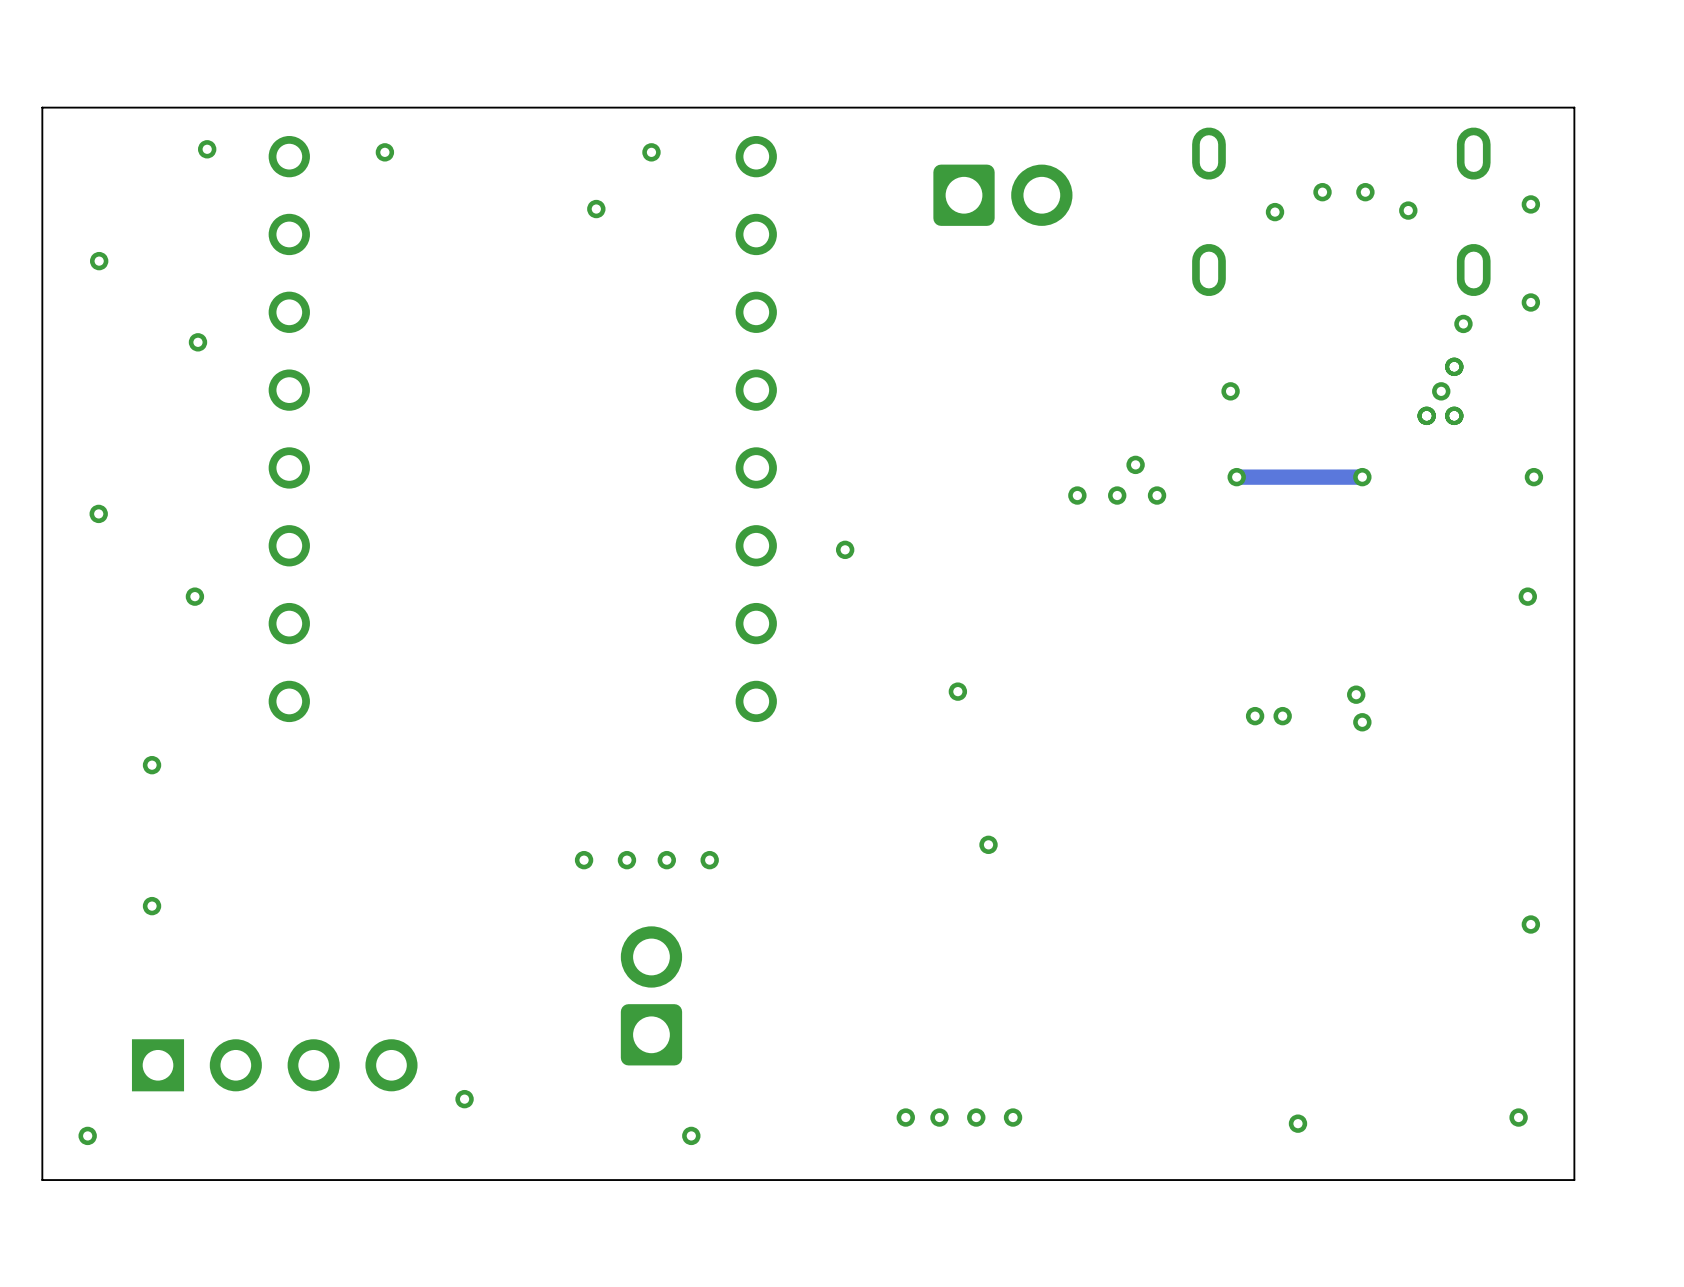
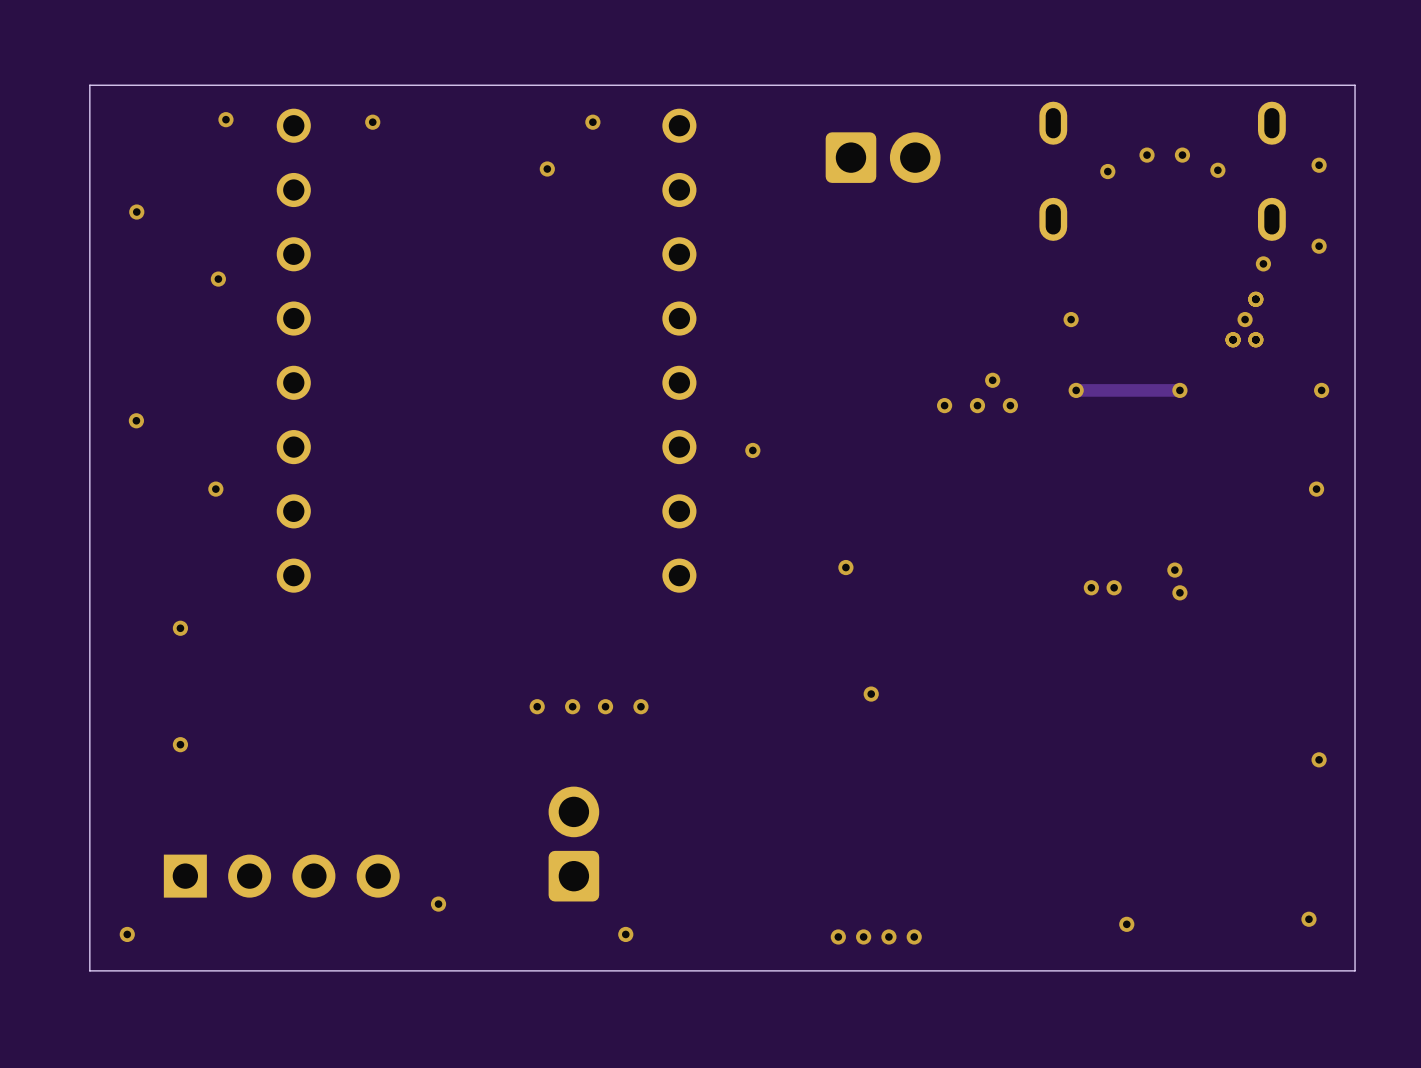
part position: (651, 995) -> (573, 844)
via: (905, 1117) -> none
via: (939, 1117) -> none
via: (976, 1117) -> none
via: (1013, 1117) -> none
via: none -> (838, 936)
via: none -> (863, 936)
via: none -> (888, 936)
via: none -> (914, 936)

